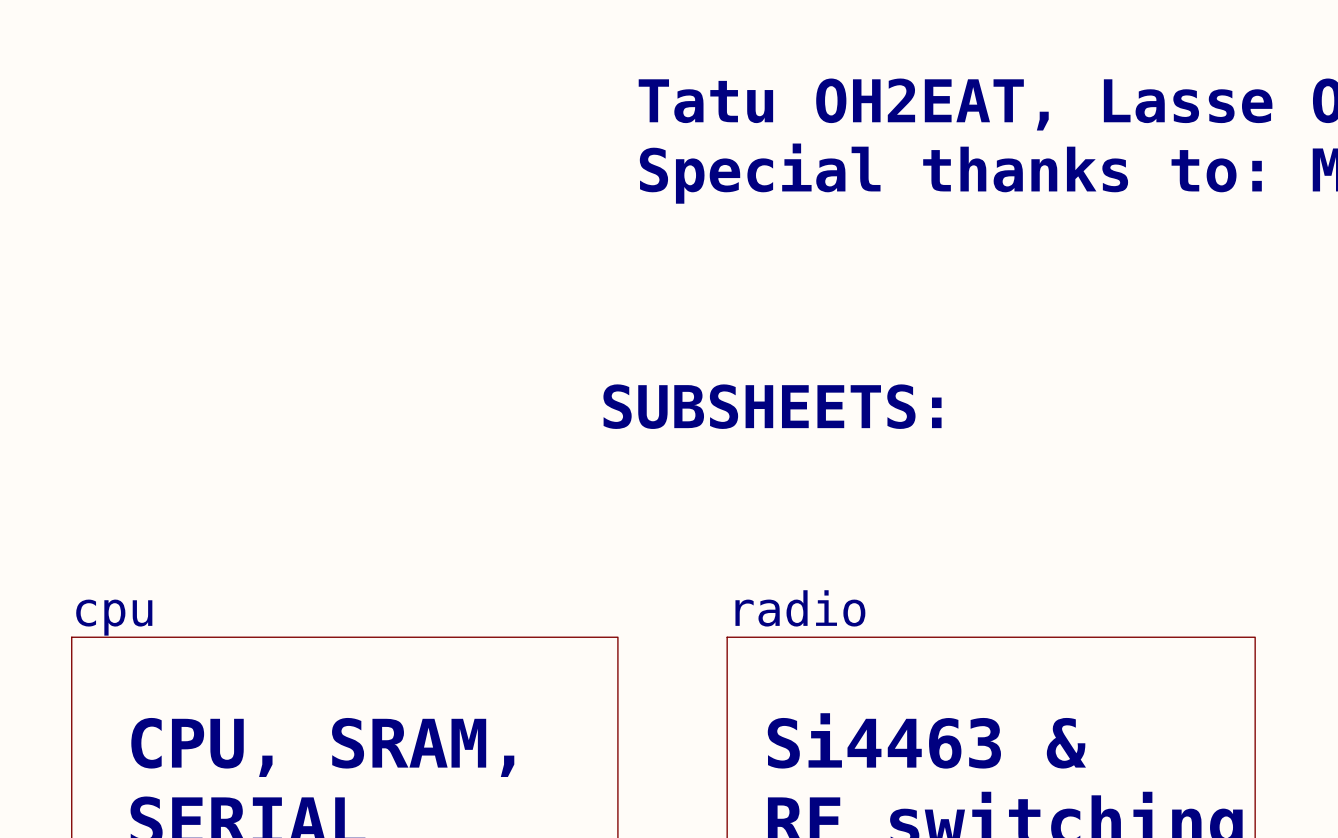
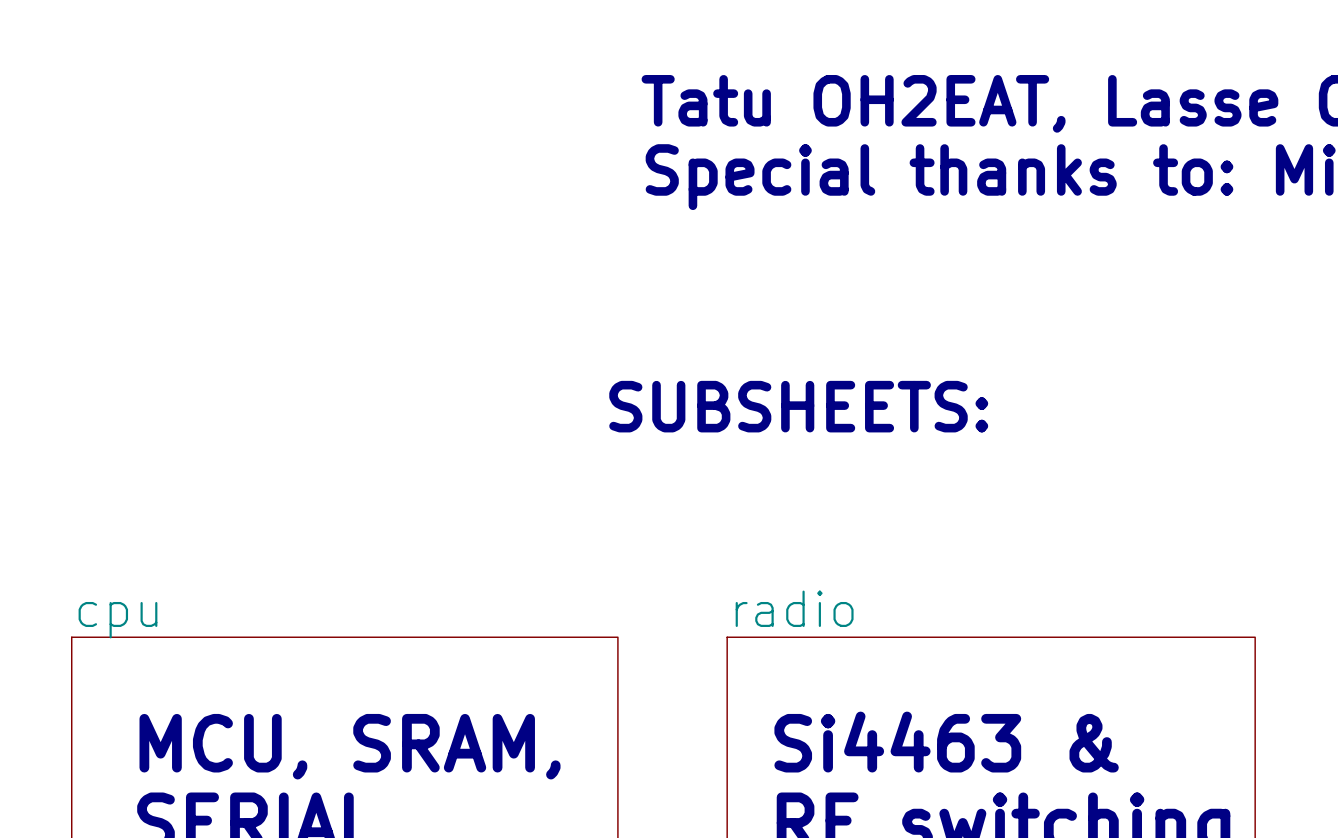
text: CPU, SRAM, (322, 747) -> MCU, SRAM, (350, 746)

